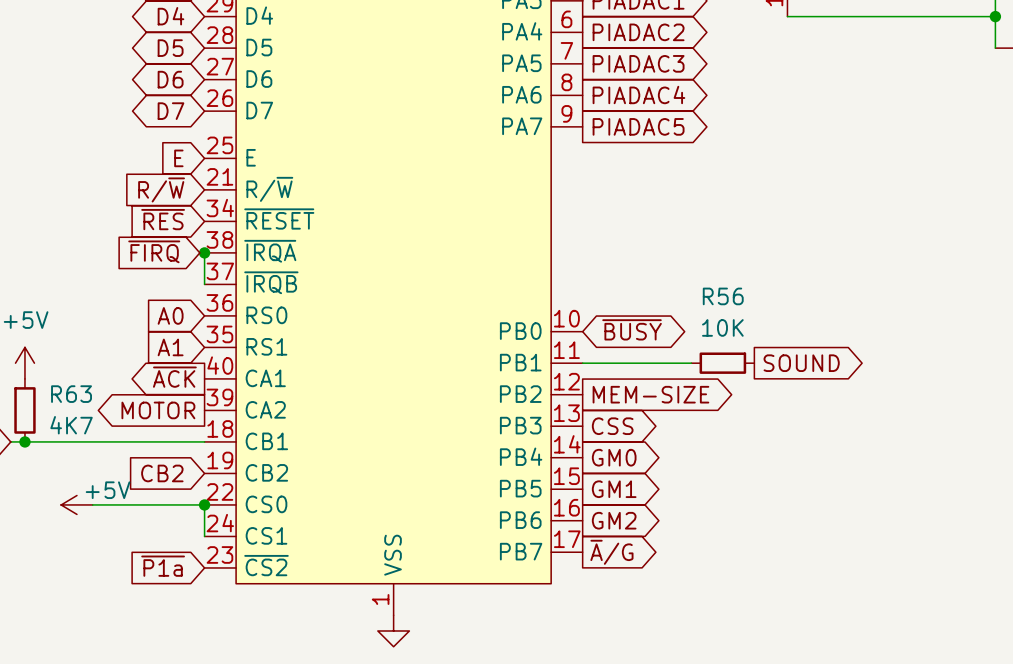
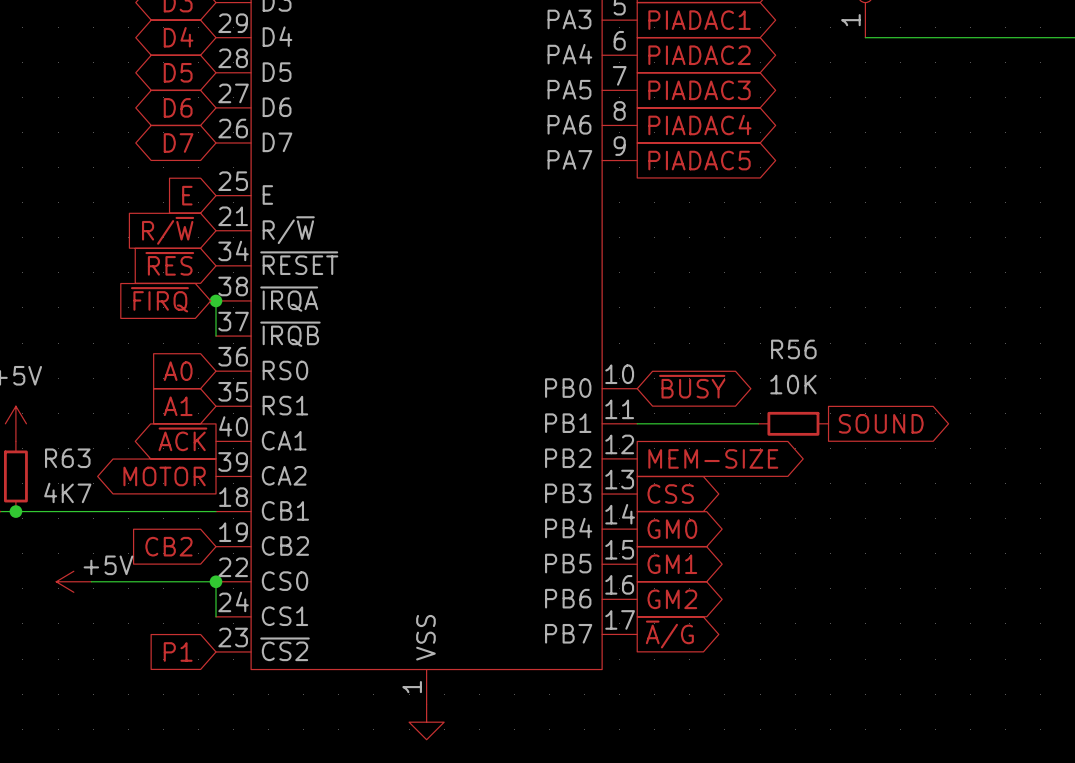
global label: ~{P1a} (163, 566) -> P1 (178, 651)

